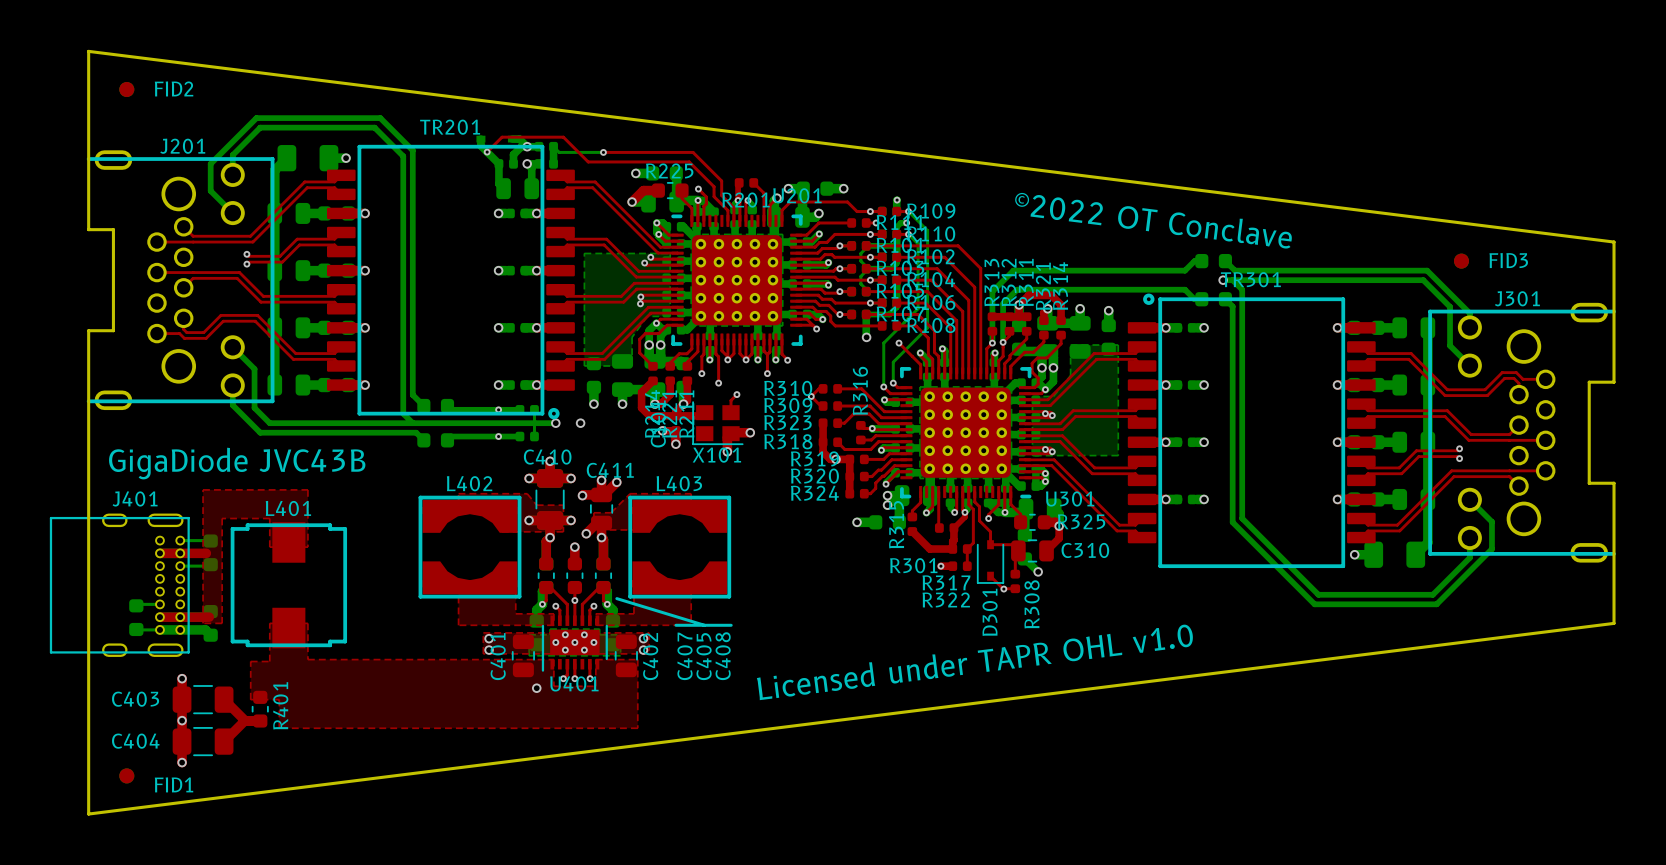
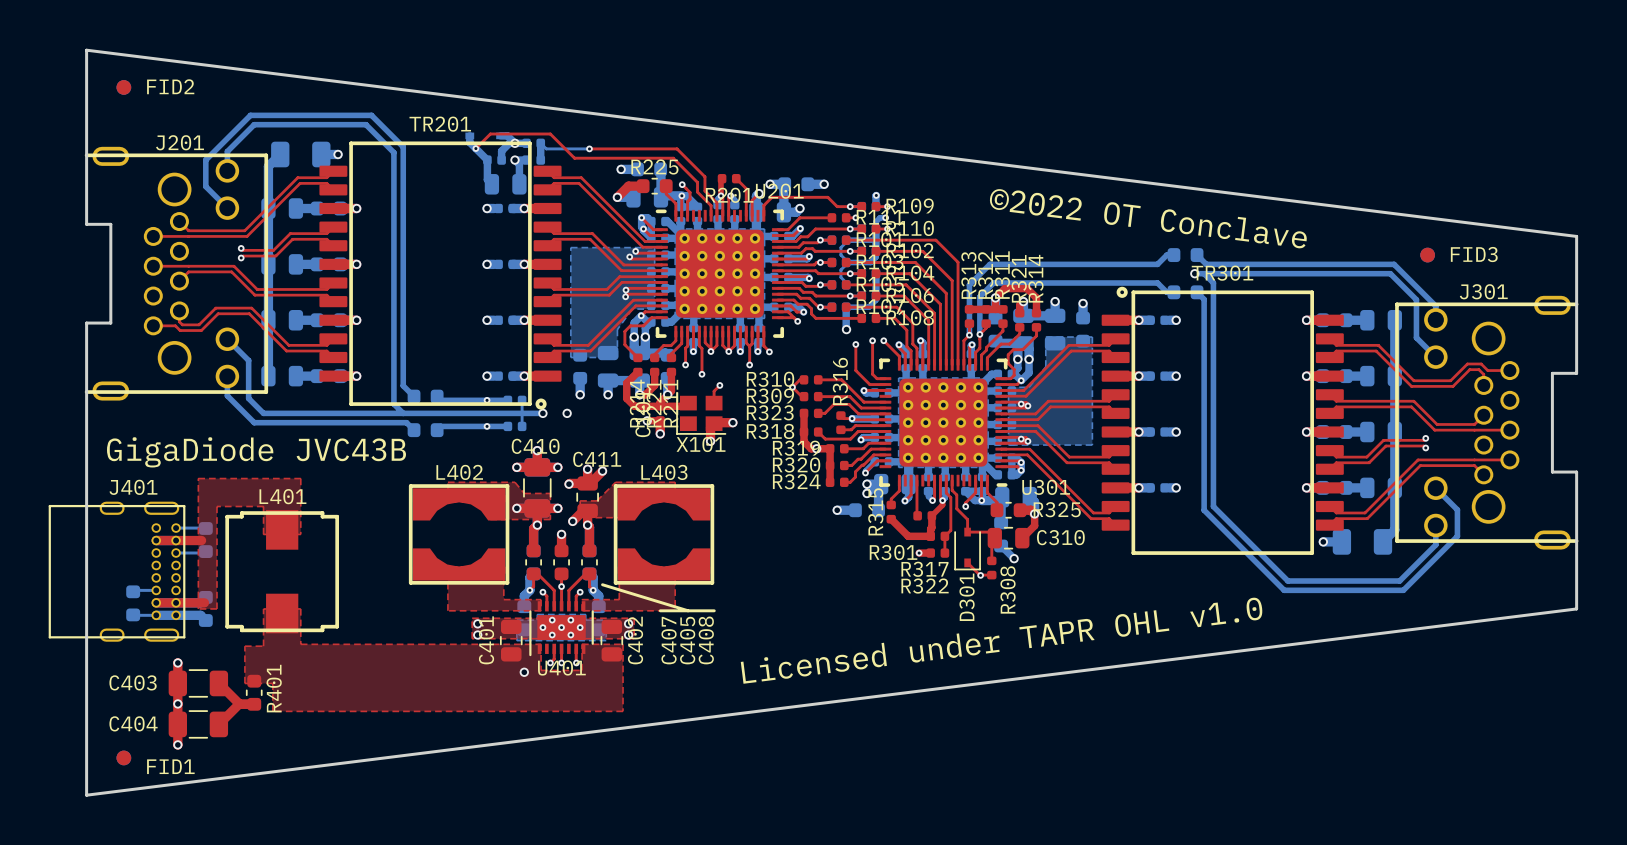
bottom track: (908, 211) (927, 230) (927, 327) (893, 362) (893, 383) -> none
bottom track: (908, 234) (918, 243) (918, 308) (883, 343) (883, 386) -> none
top track: (899, 343) (904, 348) -> none
via: (899, 343) -> none
top track: none -> (872, 340) (872, 374)
via: none -> (872, 340)
via: none -> (883, 340)
top track: none -> (855, 344) (855, 370) (863, 377)
via: none -> (855, 344)
via: (893, 383) -> none
via: (883, 386) -> none

